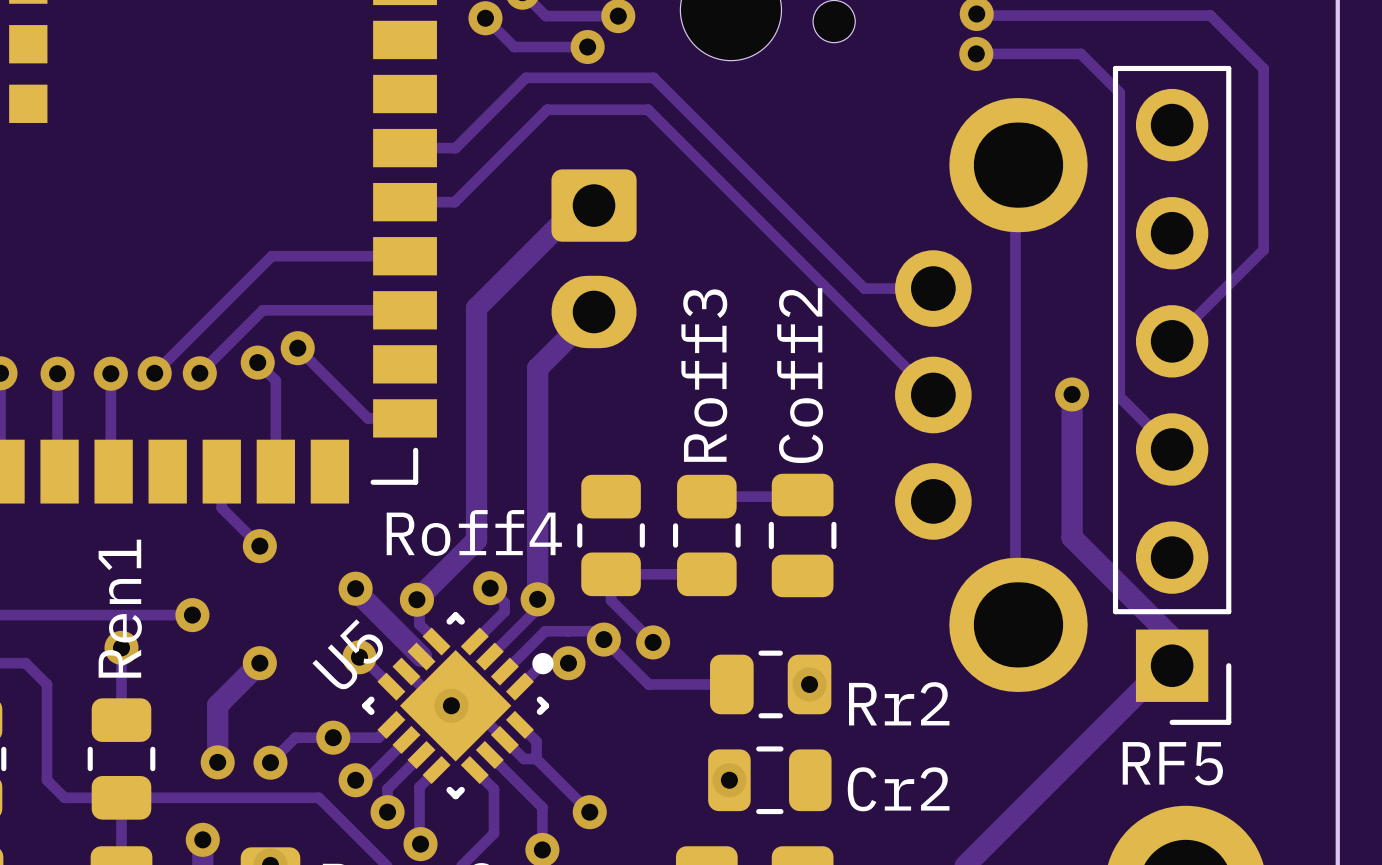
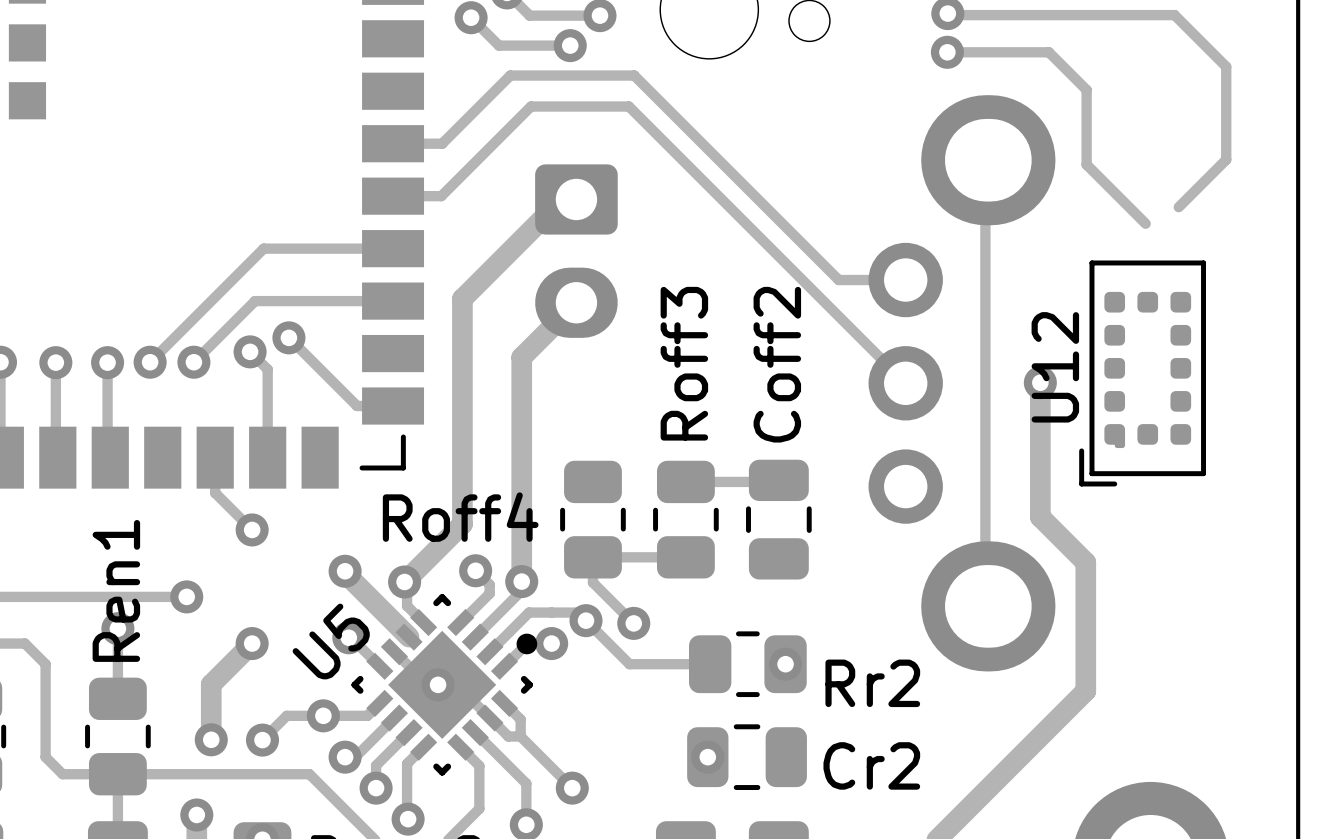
track: (1263, 164) (1263, 249) (1172, 341) -> (1226, 159) (1178, 207)
track: (1119, 169) (1119, 397) (1172, 449) -> (1086, 164) (1145, 223)
U12: none -> (1142, 373)
RF5: (1172, 395) -> none
track: (1072, 532) (1072, 537) (1170, 635) (1170, 665) (1165, 665) (1118, 712) -> (1040, 517) (1085, 562) (1085, 691)

